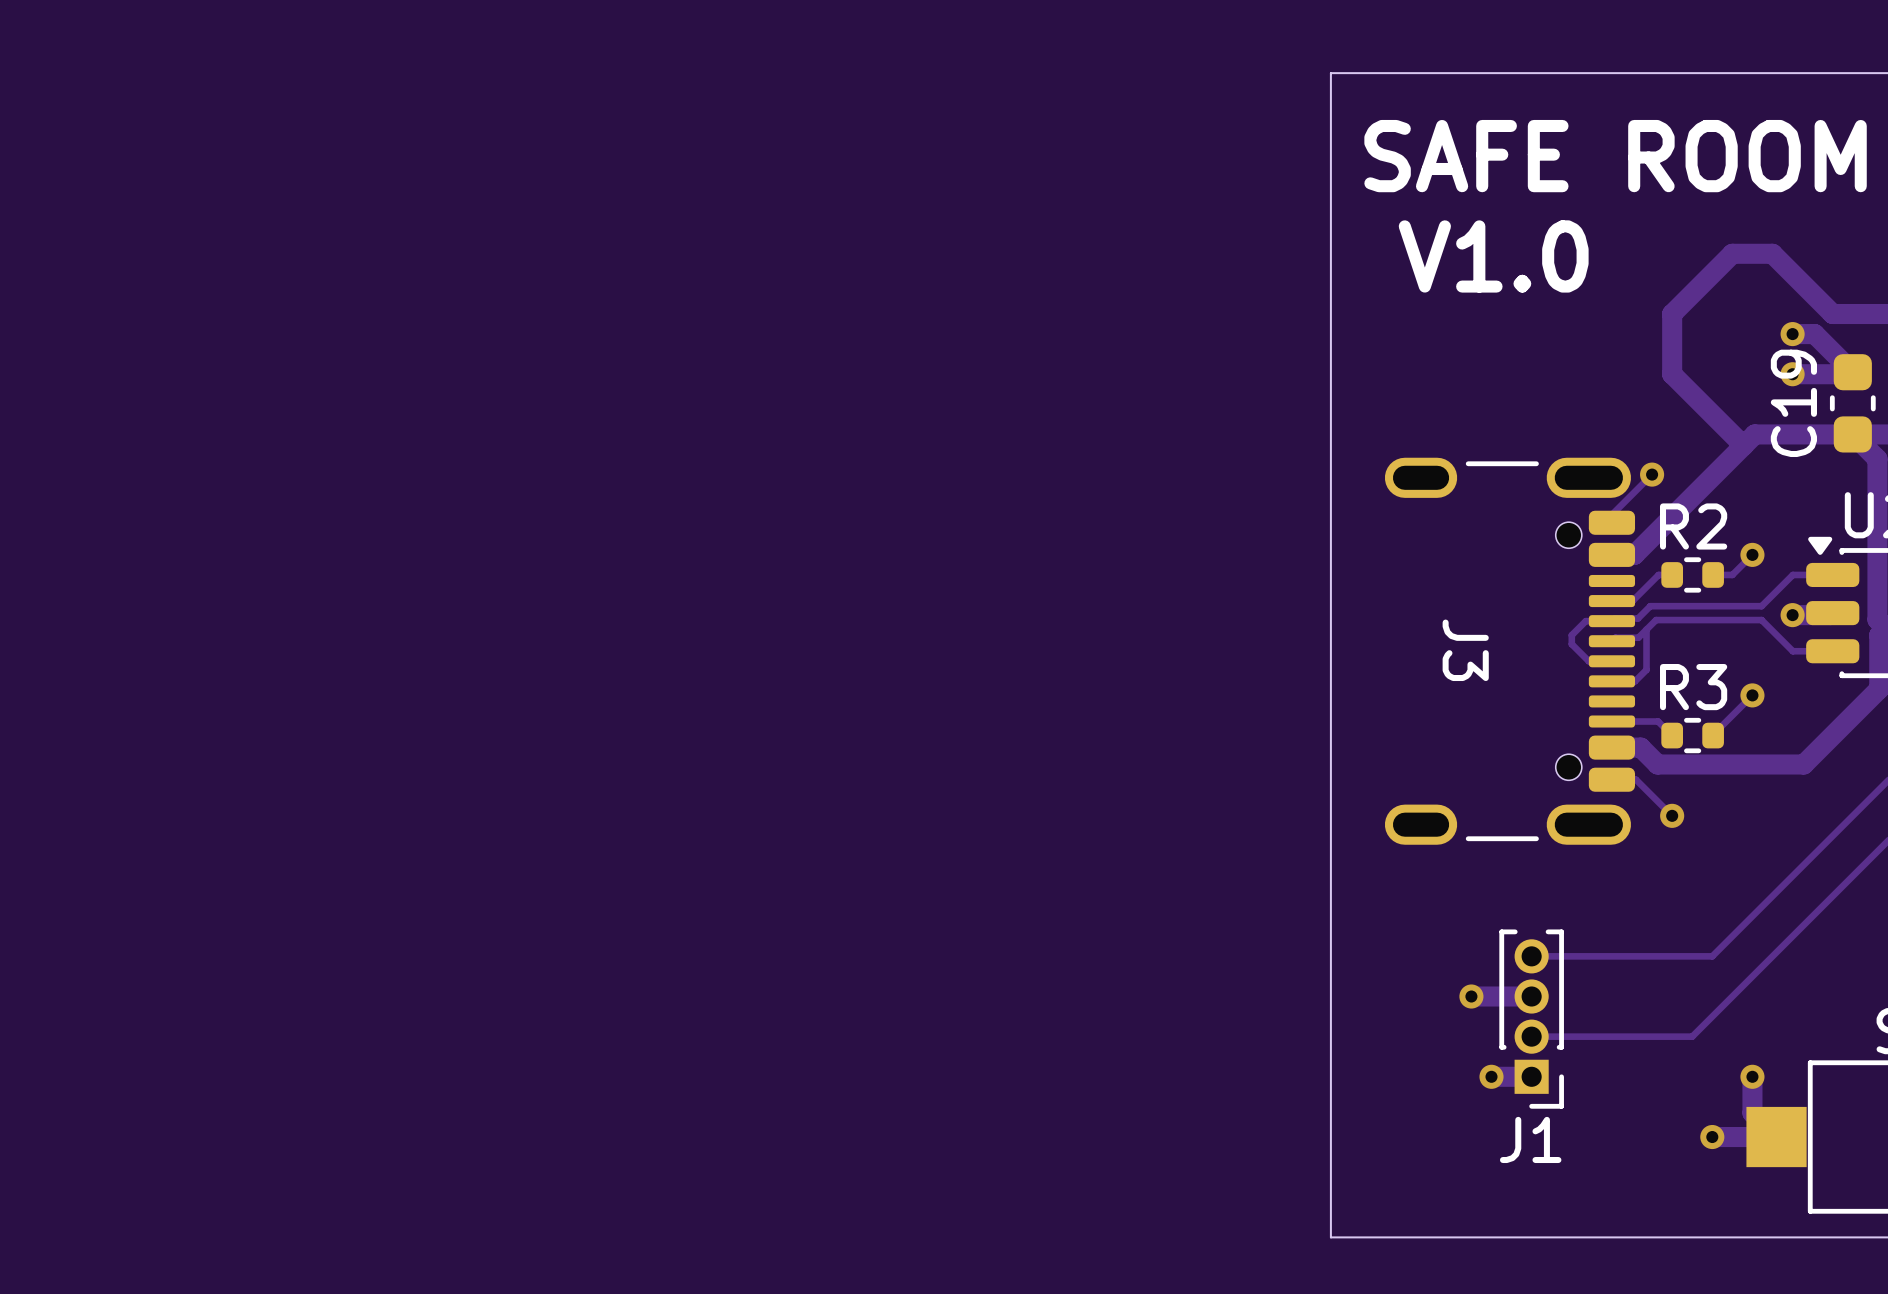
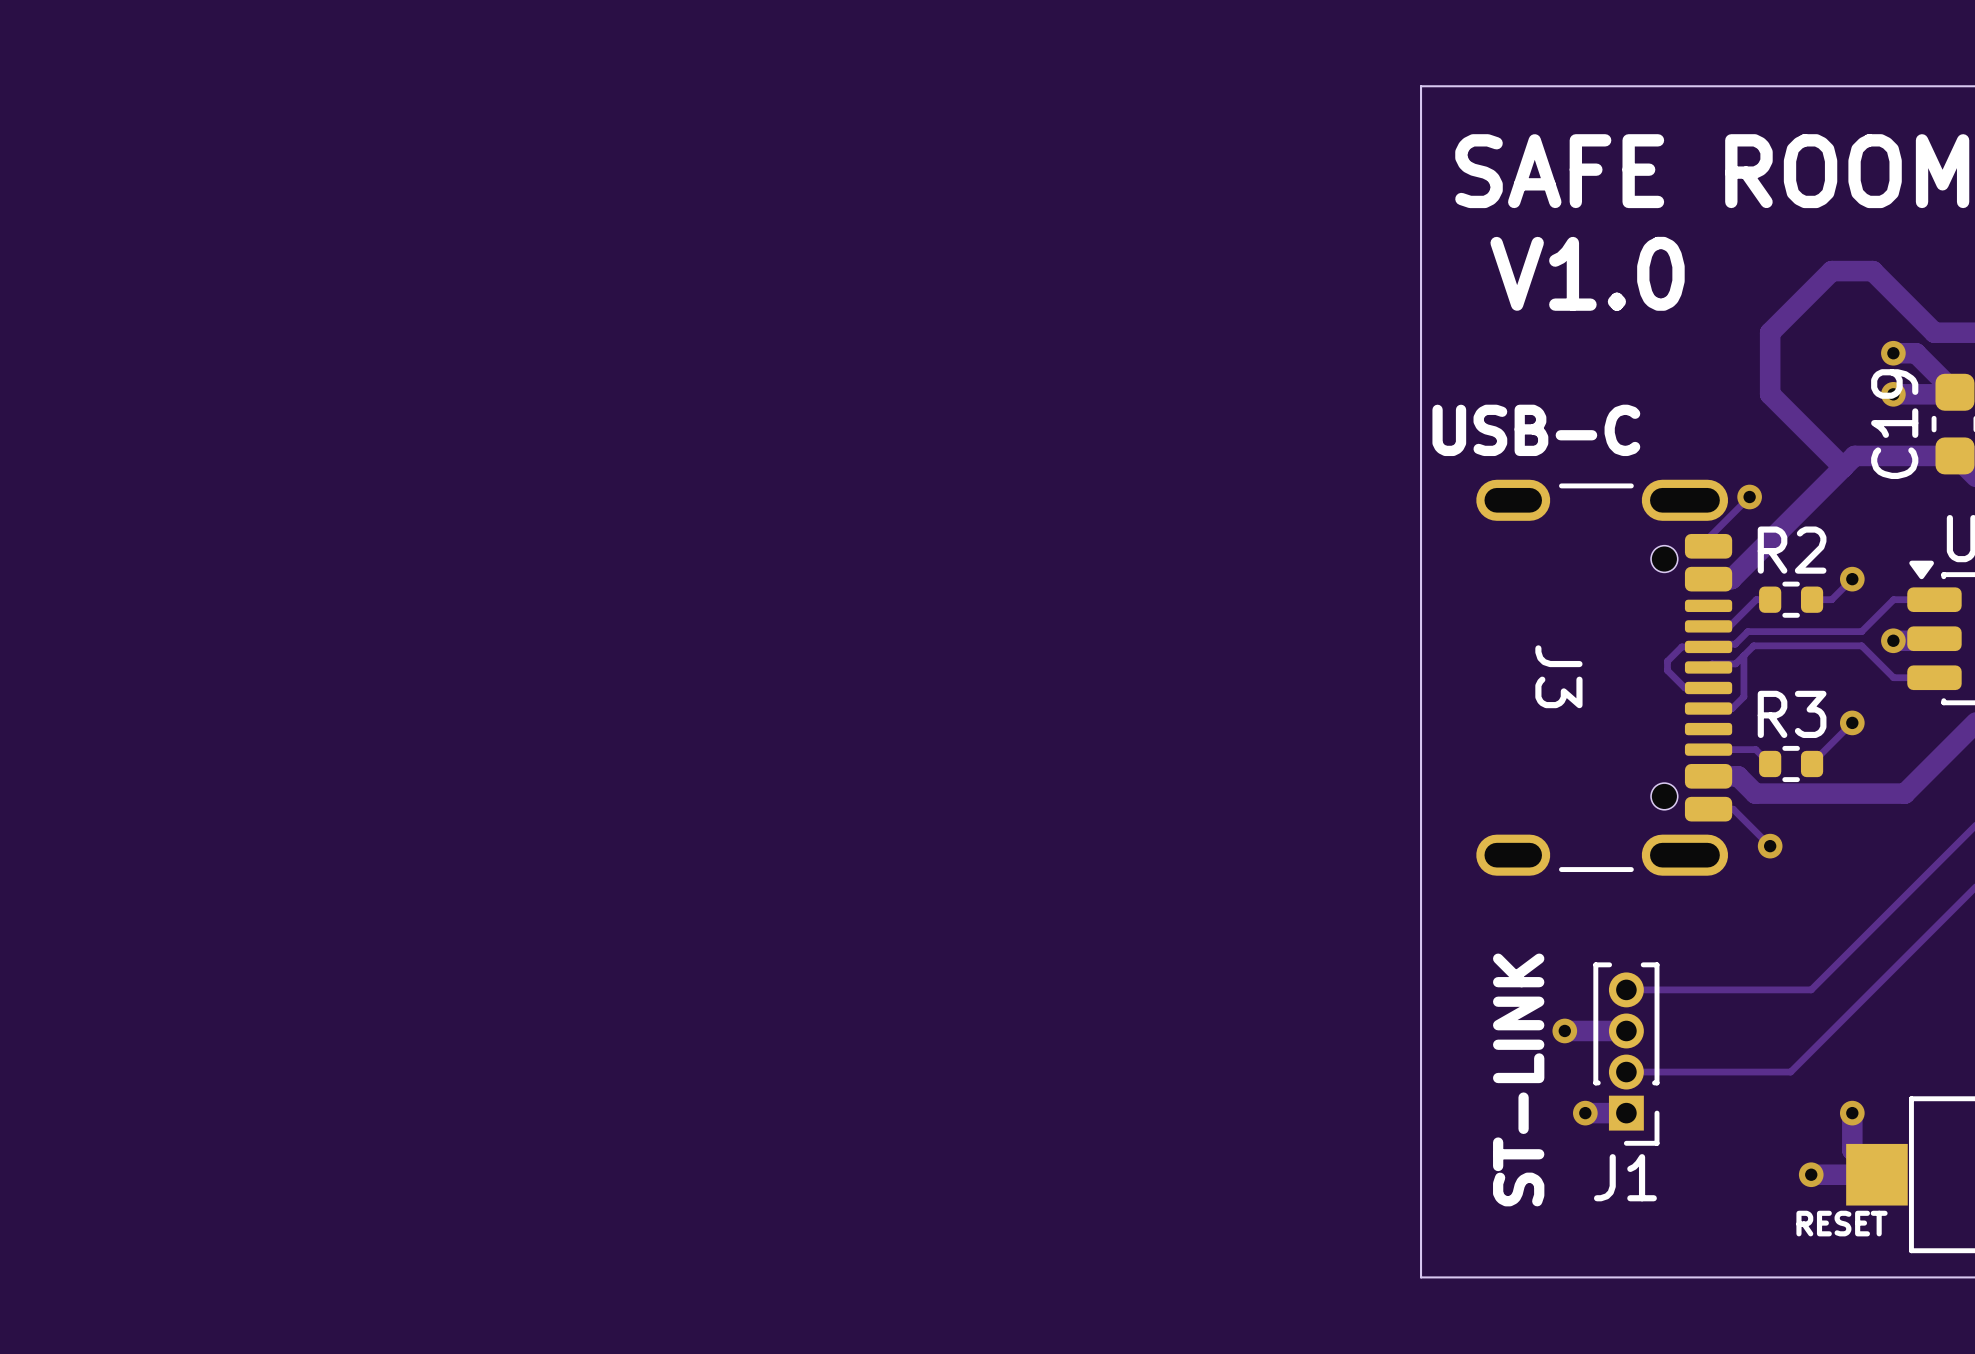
text: none -> USB-C (1536, 430)
text: none -> ST-LINK (1518, 1079)
text: none -> RESET (1842, 1223)

